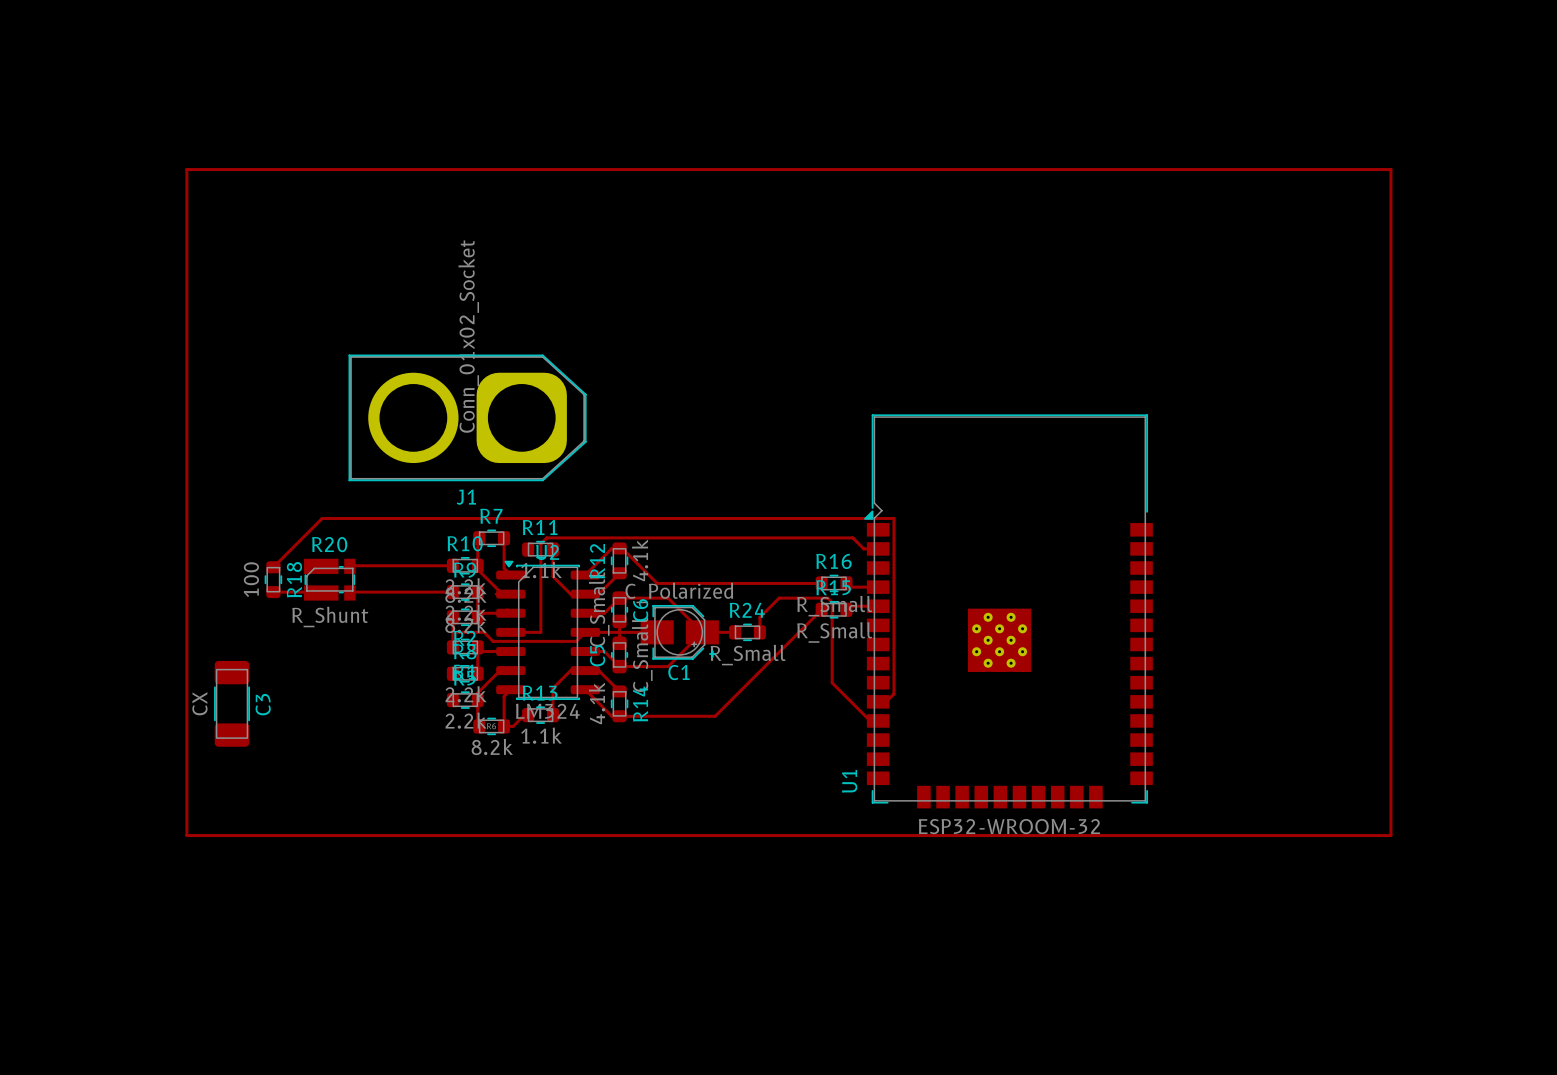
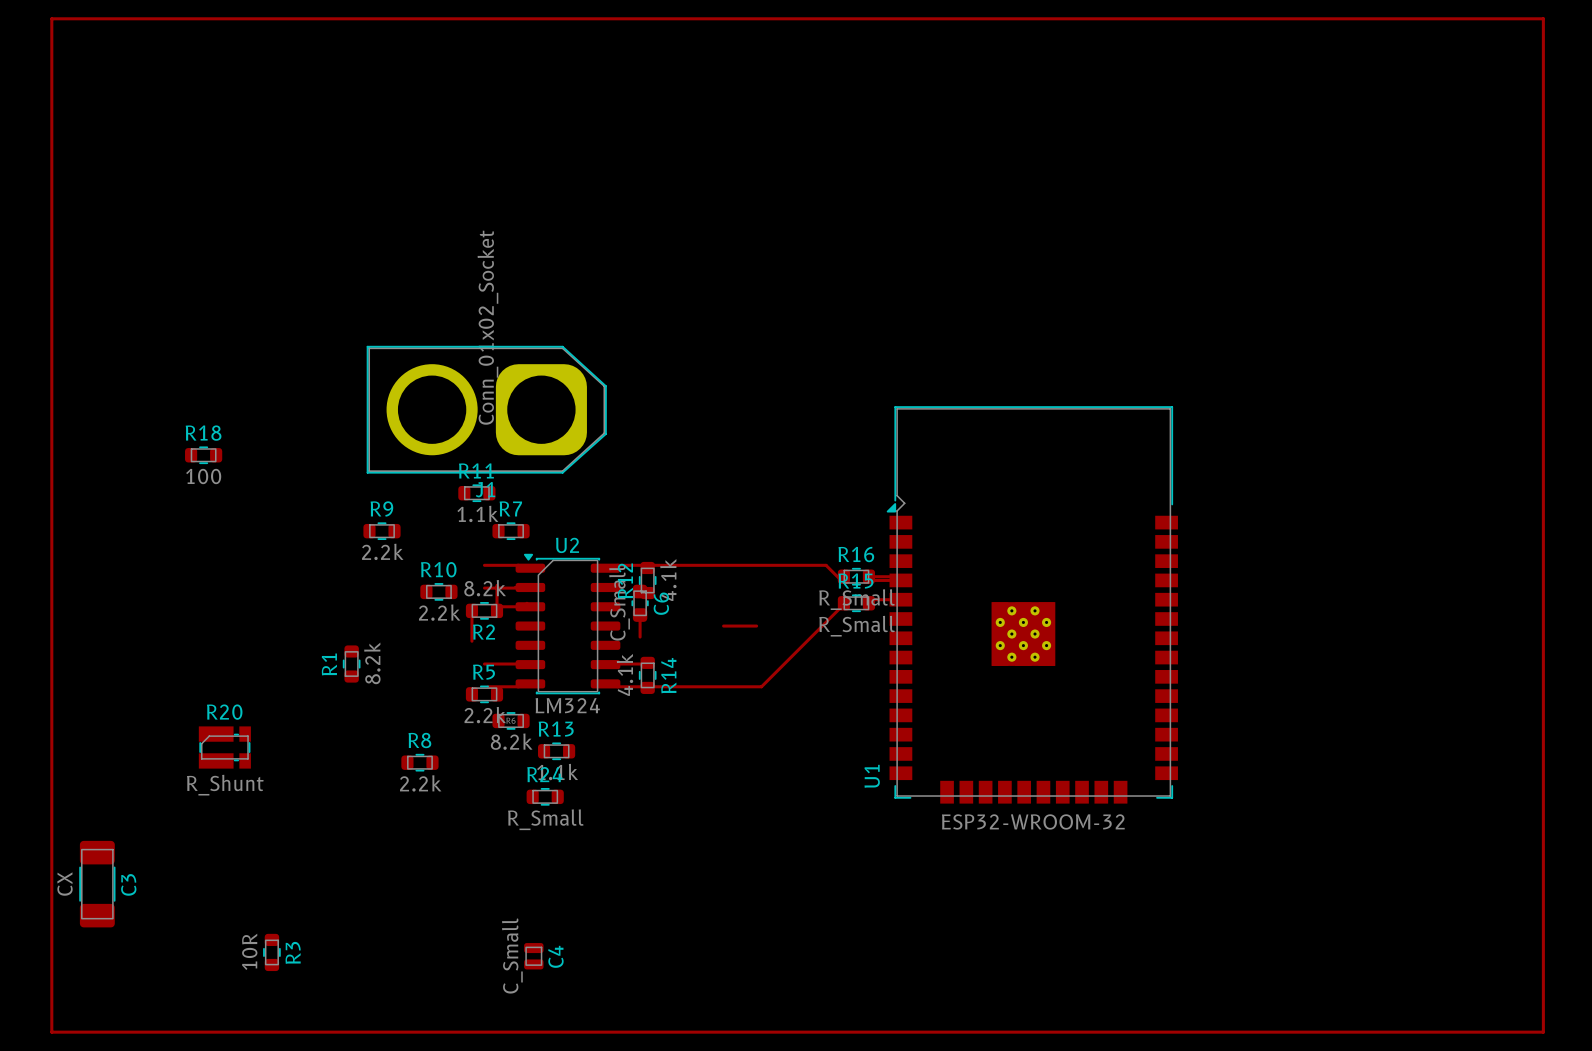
top track: (186, 169) (1390, 169) (1390, 835) (186, 835) (186, 169) -> (51, 18) (51, 1032) (1543, 1032) (1543, 18) (51, 18)
top track: (479, 538) (477, 569) (502, 594) -> none
top track: (504, 538) (504, 568) (510, 575) -> none
top track: (878, 548) (863, 548) (852, 537) (546, 537) (540, 543) (540, 632) (510, 632) -> none
R11 position: (540, 549) -> (476, 493)
top track: (552, 549) (552, 576) (570, 594) (598, 594) (619, 573) -> none
R12 position: (619, 560) -> (647, 580)
top track: (452, 565) (349, 566) -> none
R10 position: (465, 565) -> (438, 591)
top track: (273, 567) (322, 518) (893, 518) (893, 693) (886, 701) (878, 701) -> none
top track: none -> (484, 565) (518, 565)
top track: none -> (617, 565) (826, 565) (841, 580)
top track: (585, 575) (611, 548) (622, 548) (657, 583) (821, 583) -> none
R18 value position: 100 (251, 579) -> 100 (203, 476)
R18 rotation: 0° (273, 579) -> 90° clockwise (203, 455)
R18 position: (273, 579) -> (203, 455)
R18 name position: R18 (294, 579) -> R18 (203, 433)
R20 position: (329, 579) -> (224, 747)
top track: none -> (871, 576) (905, 576)
top track: (273, 592) (321, 593) -> none
top track: (452, 592) (349, 593) -> none
R9 position: (465, 592) -> (382, 531)
top track: none -> (484, 588) (518, 588)
top track: (821, 609) (715, 716) (611, 716) (585, 689) -> none
top track: none -> (845, 603) (761, 686) (651, 686)
top track: (585, 613) (604, 613) (619, 598) (668, 598) (702, 632) (668, 666) (619, 666) (604, 651) (585, 651) -> none
top track: (452, 632) (484, 632) (493, 641) (576, 641) (585, 632) (657, 632) -> none
C1: C_Polarized (679, 632) -> none
R24 position: (747, 632) -> (545, 796)
top track: (759, 632) (759, 617) (779, 598) (827, 598) (832, 602) (832, 682) (870, 720) (878, 720) -> none
R1 rotation: 0° (465, 647) -> 90° clockwise (351, 664)
R1 position: (465, 647) -> (351, 664)
top track: (510, 651) (481, 651) (477, 647) (477, 673) -> none
C5: C_Small (619, 654) -> none
top track: none -> (484, 664) (518, 664)
top track: none -> (617, 664) (643, 664)
top track: (510, 670) (500, 670) (477, 692) (479, 726) -> none
R8 position: (465, 673) -> (419, 762)
top track: (510, 689) (504, 696) (504, 726) (513, 726) (524, 715) (528, 715) -> none
top track: (619, 691) (598, 670) (570, 670) (552, 688) (552, 715) -> none
top track: none -> (488, 686) (518, 686)
top track: none -> (617, 686) (643, 686)
C3 position: (232, 703) -> (97, 884)
R14 position: (619, 703) -> (647, 675)
R13 position: (540, 715) -> (556, 751)
R3: none -> 10R (271, 952)
C4: none -> C_Small (533, 956)

